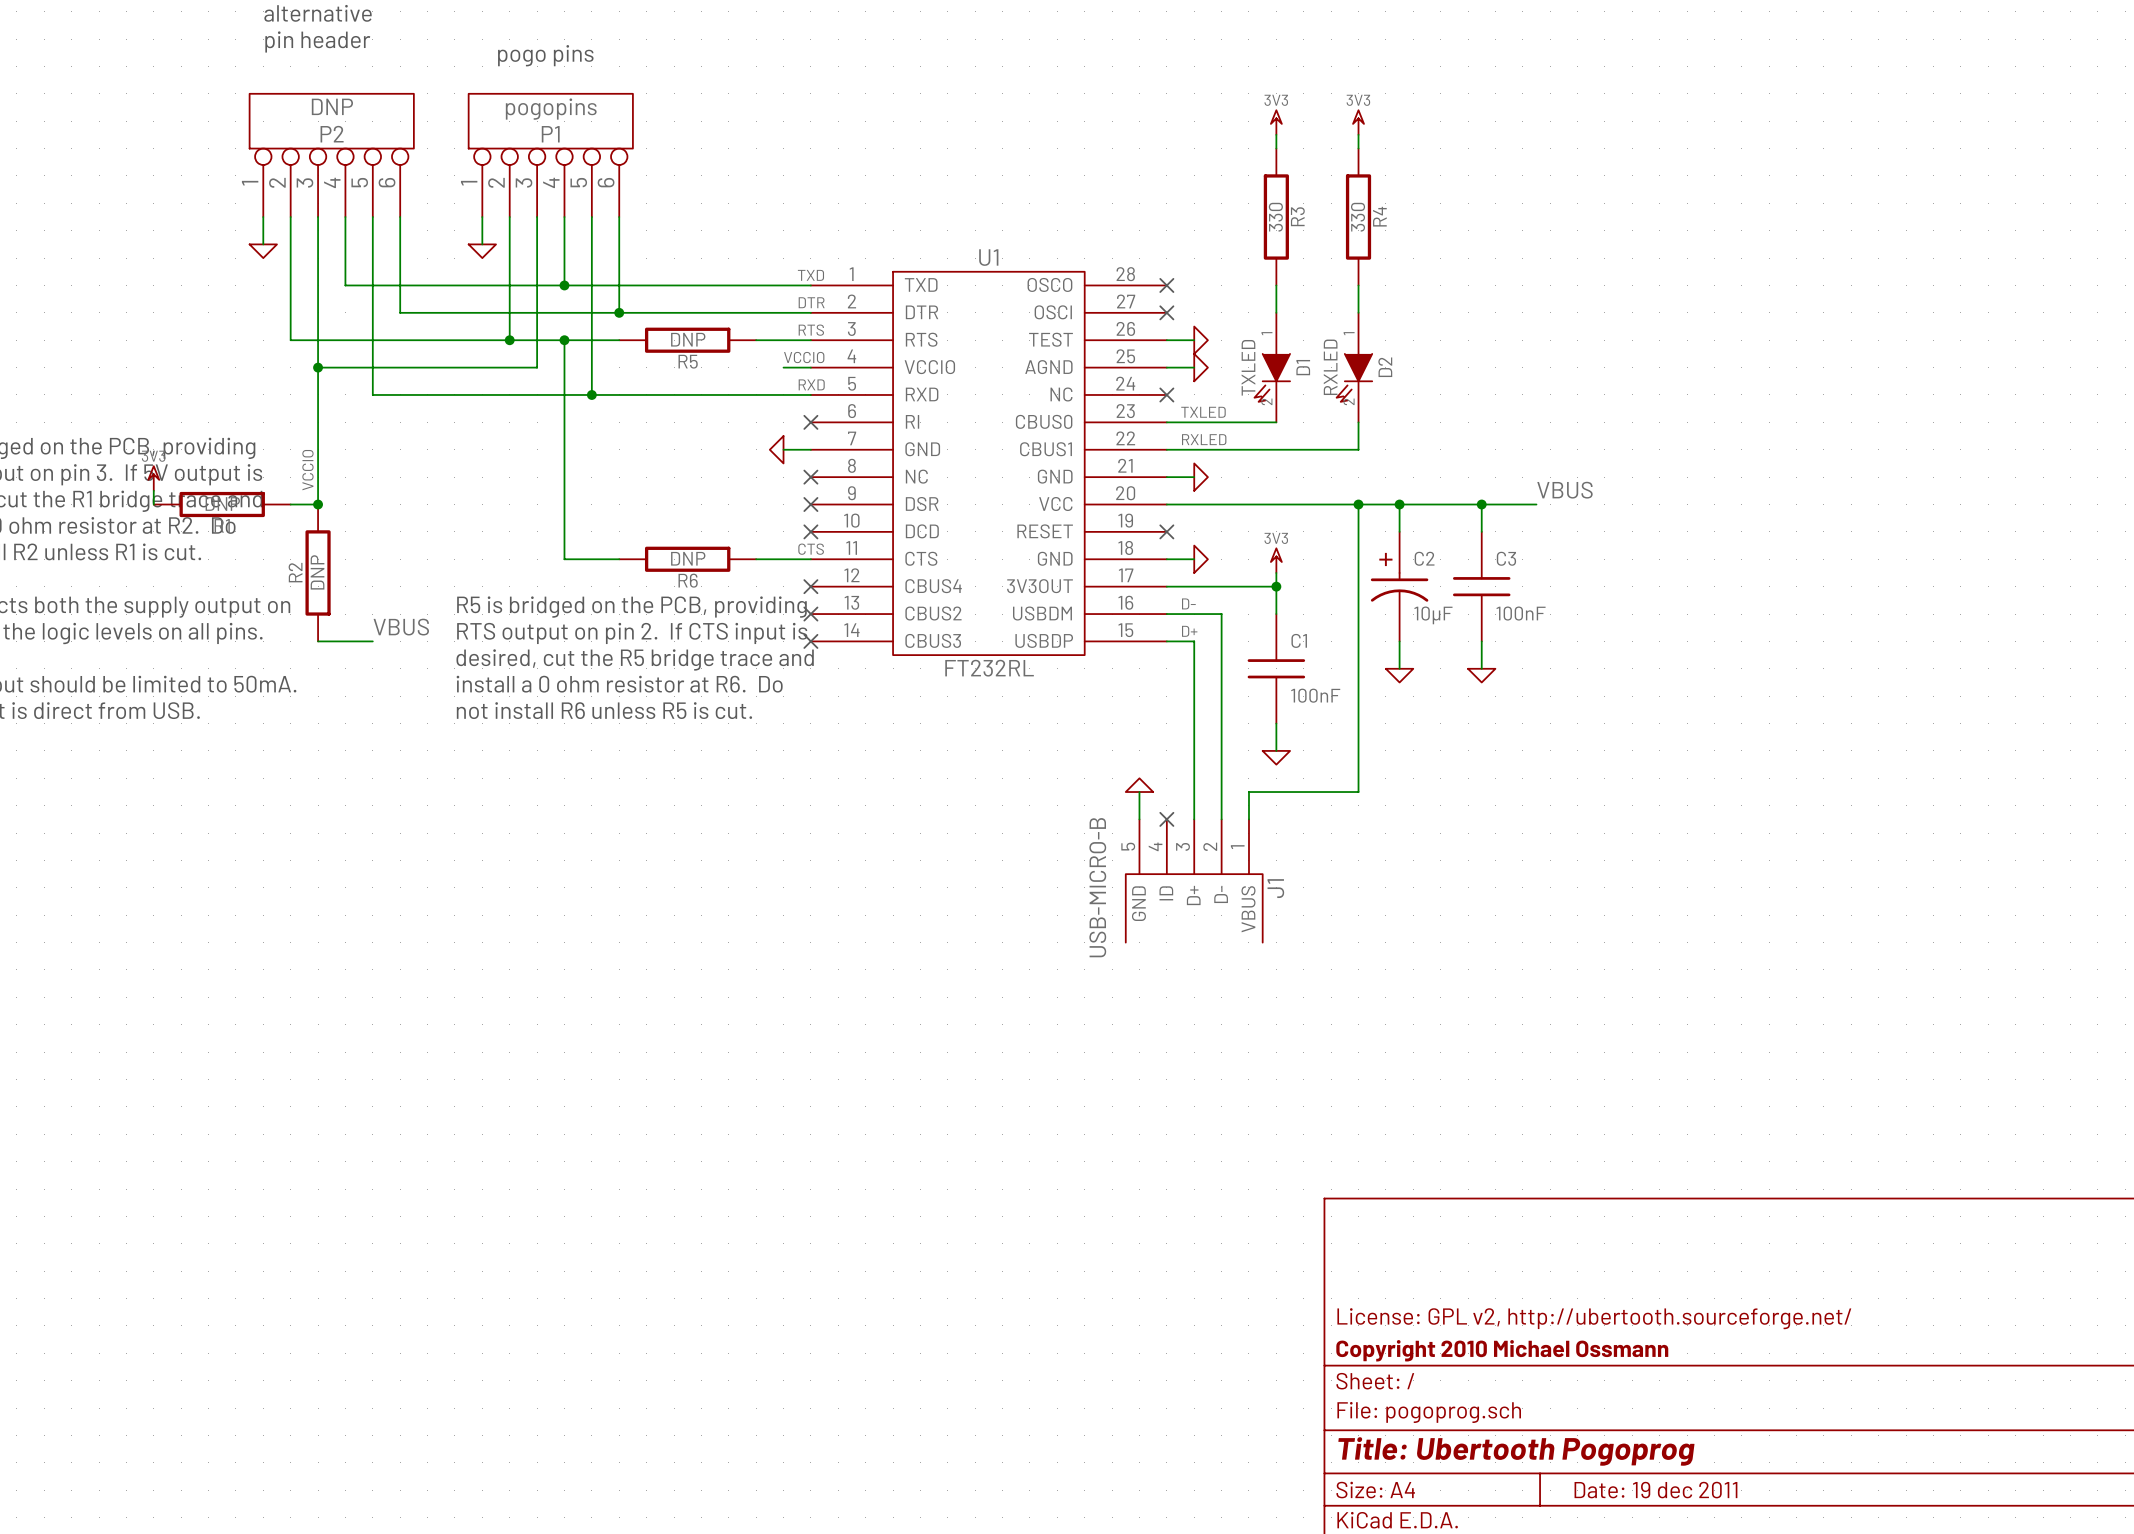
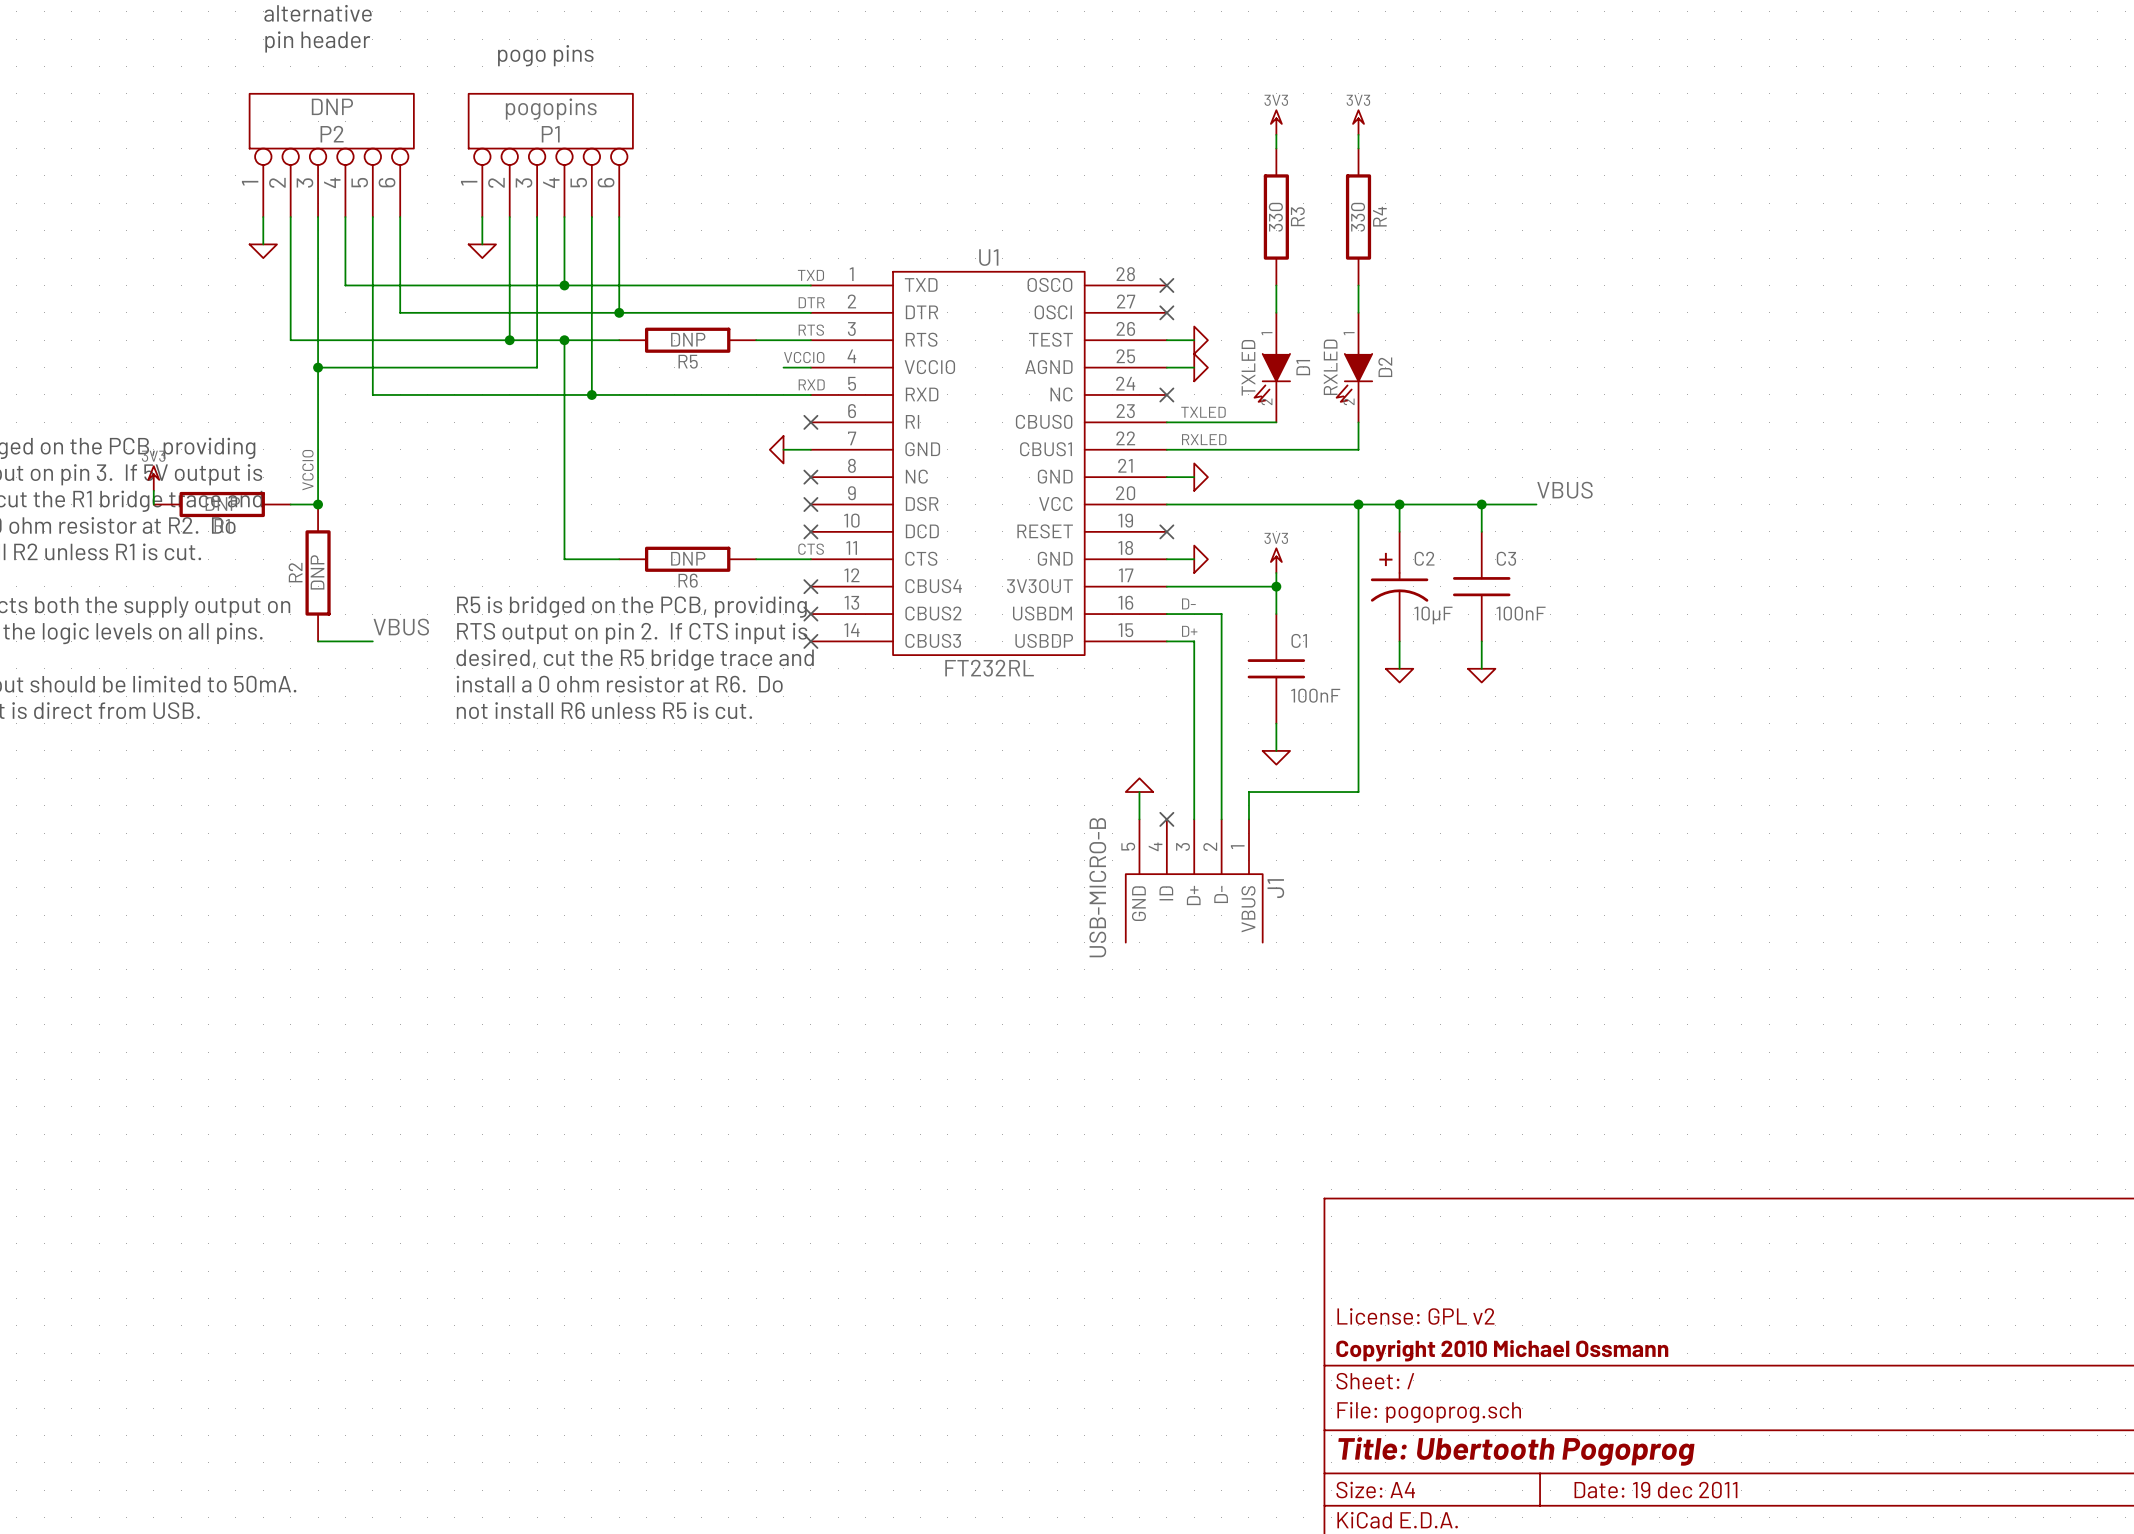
title block: License: GPL v2, http://ubertooth.sourceforge.net/ (1594, 1318) -> License: GPL v2 (1415, 1316)

